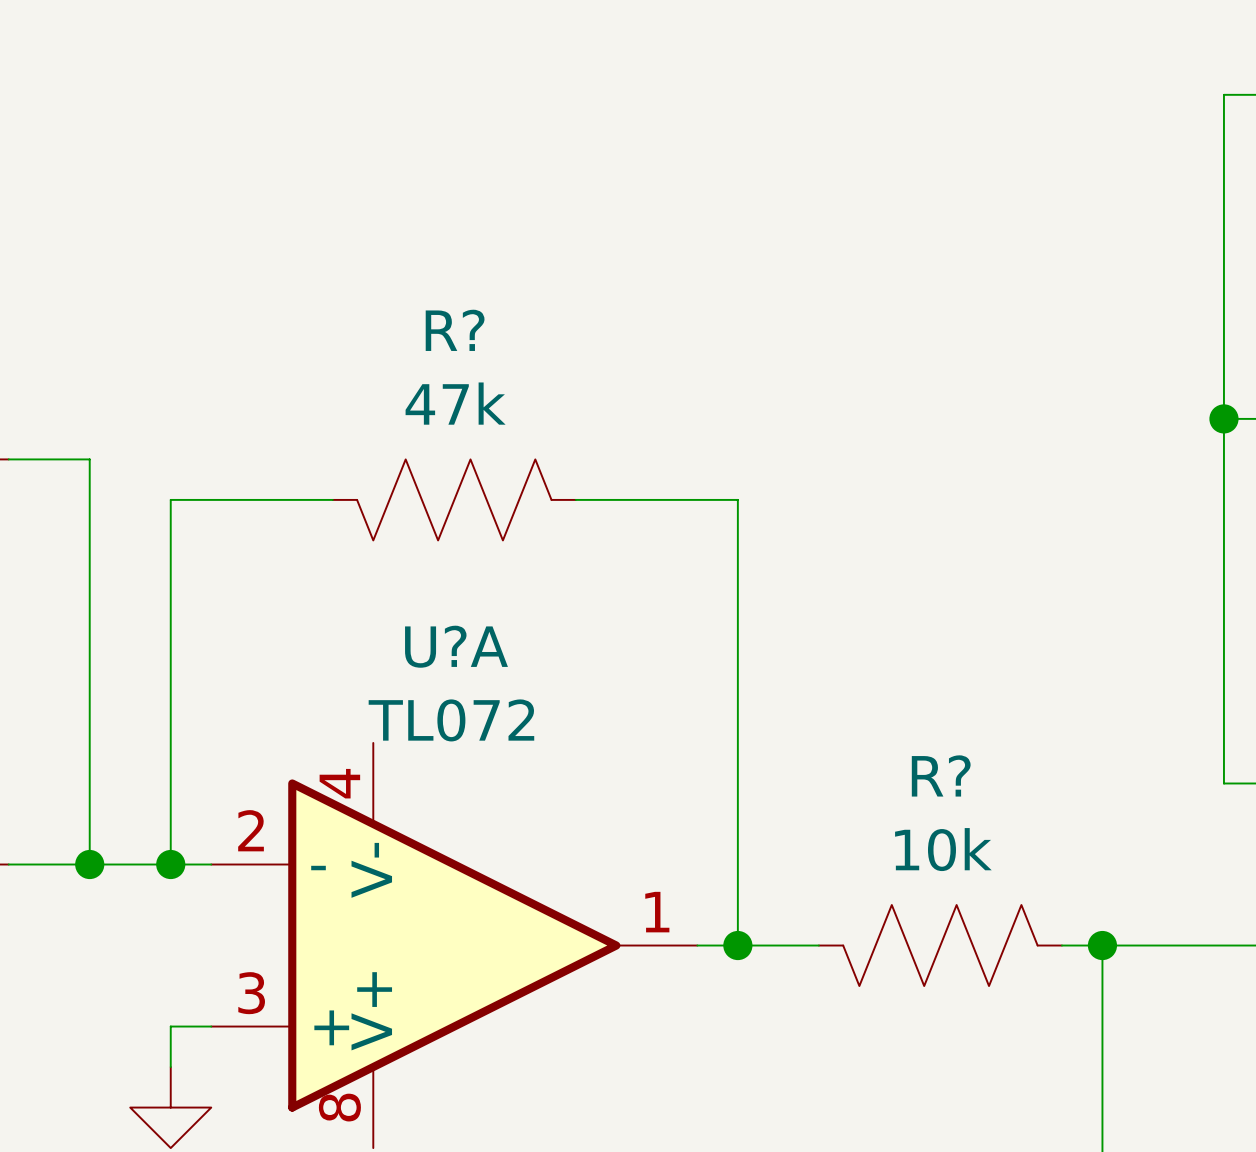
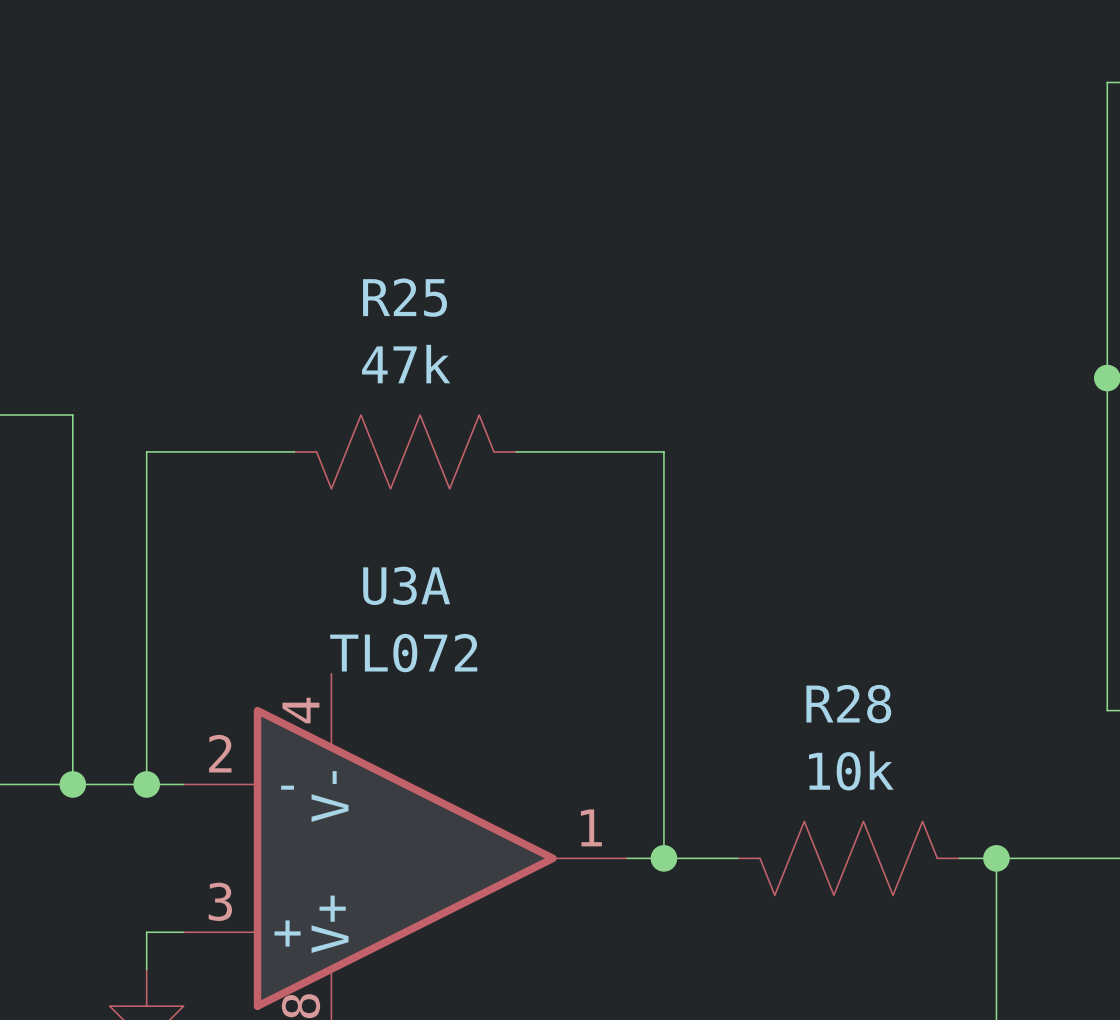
R? name: R? (455, 330) -> R25 (405, 297)
U?A name: U?A (456, 646) -> U3A (406, 585)
R? name: R? (941, 775) -> R28 (848, 704)

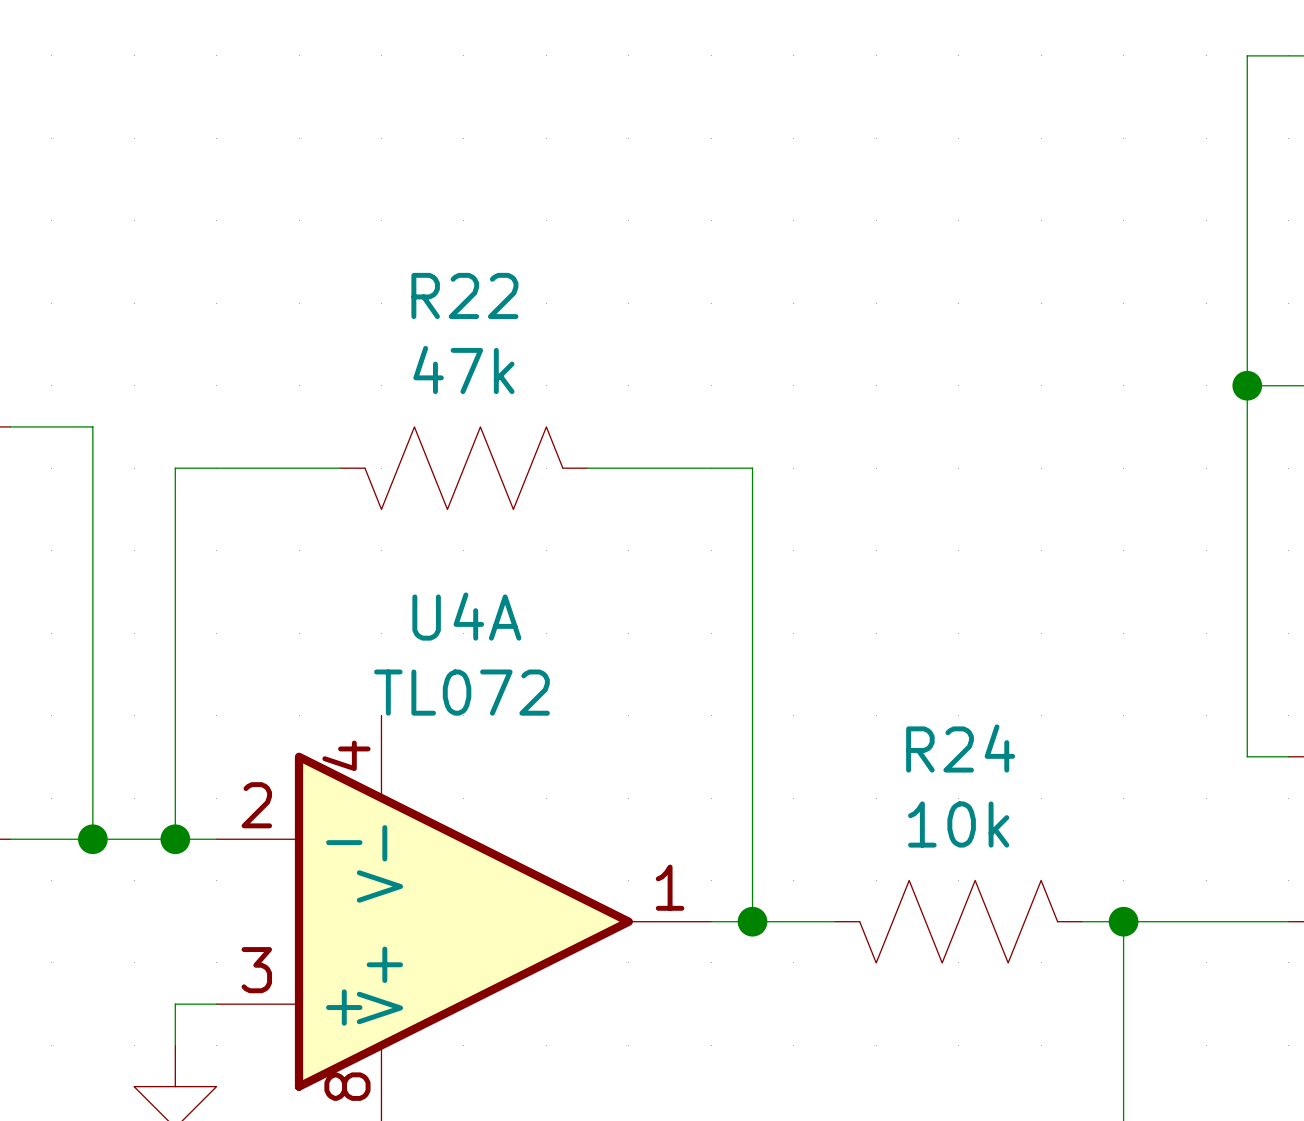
R25 name: R25 (405, 297) -> R22 (464, 295)
U3A name: U3A (406, 585) -> U4A (466, 616)
R28 name: R28 (848, 704) -> R24 (960, 748)

